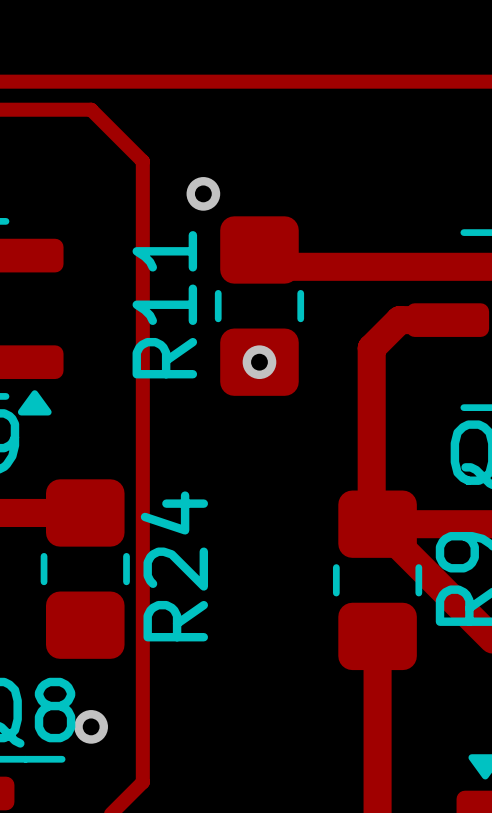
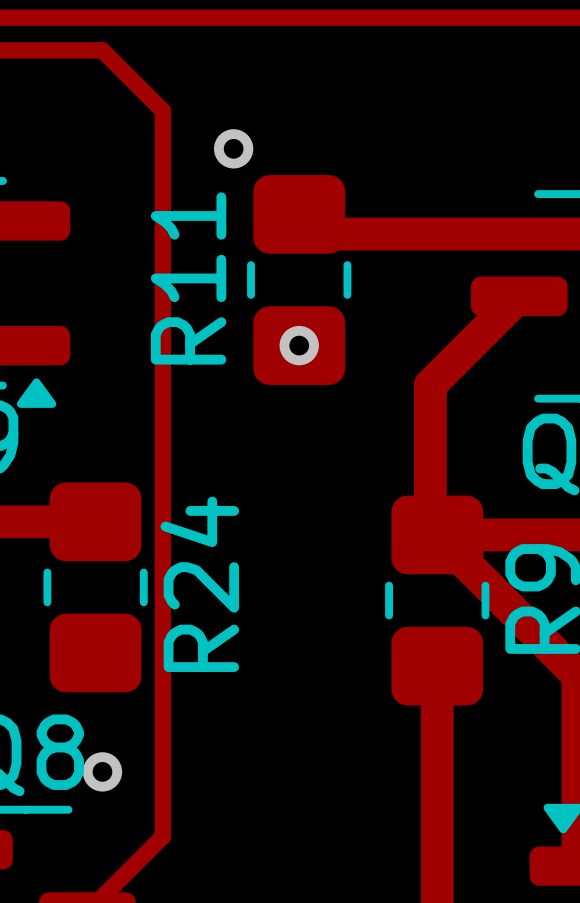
track: (447, 320) (399, 320) (371, 348) (371, 396) -> (519, 296) (430, 385)

